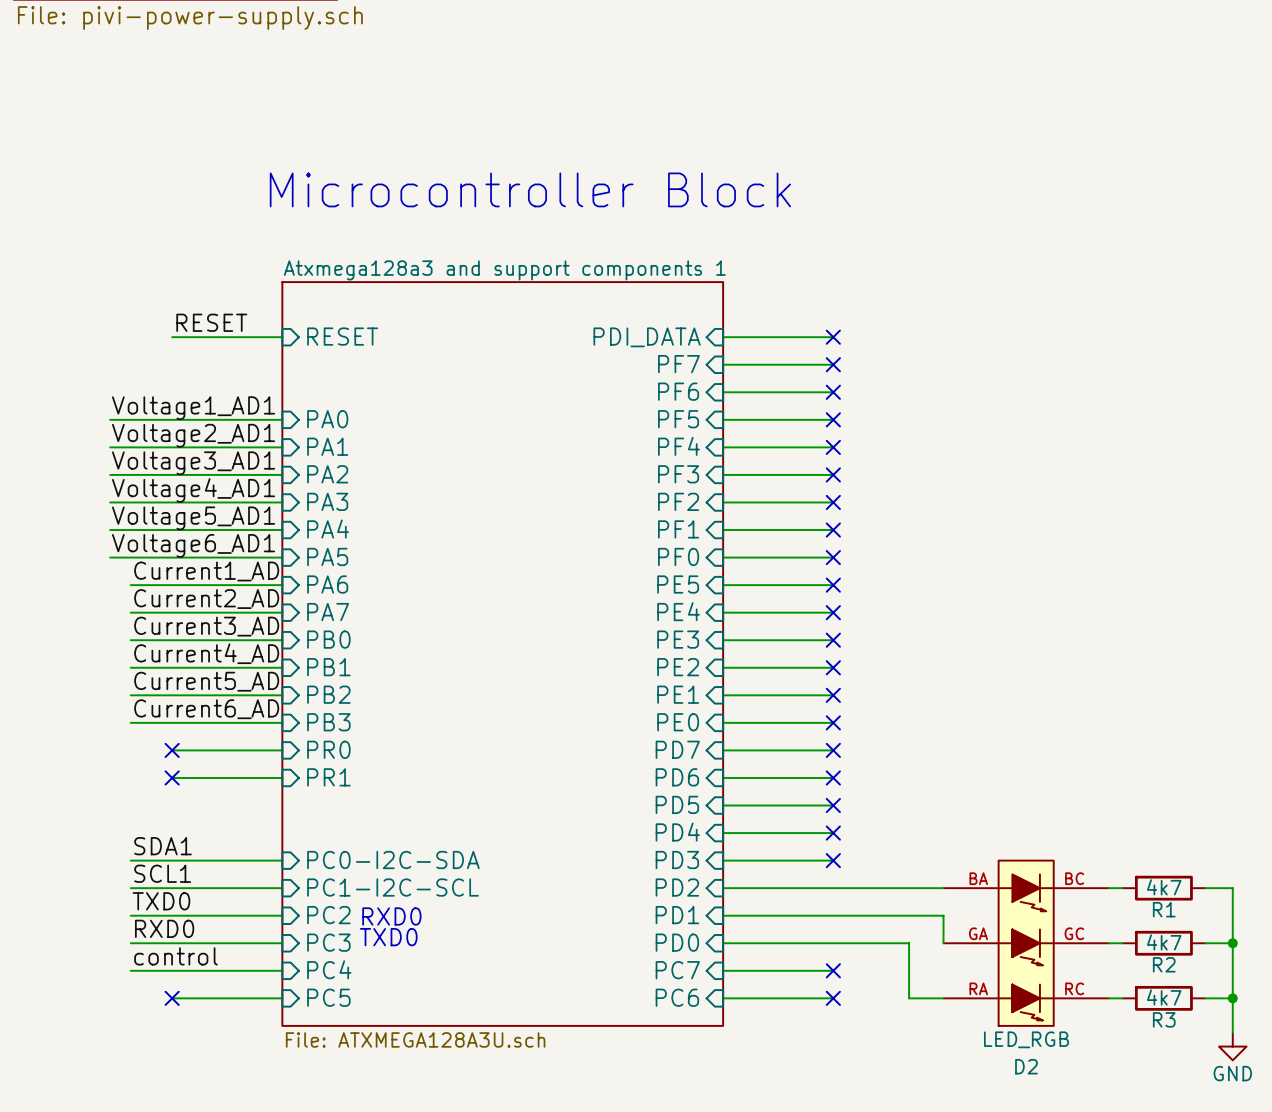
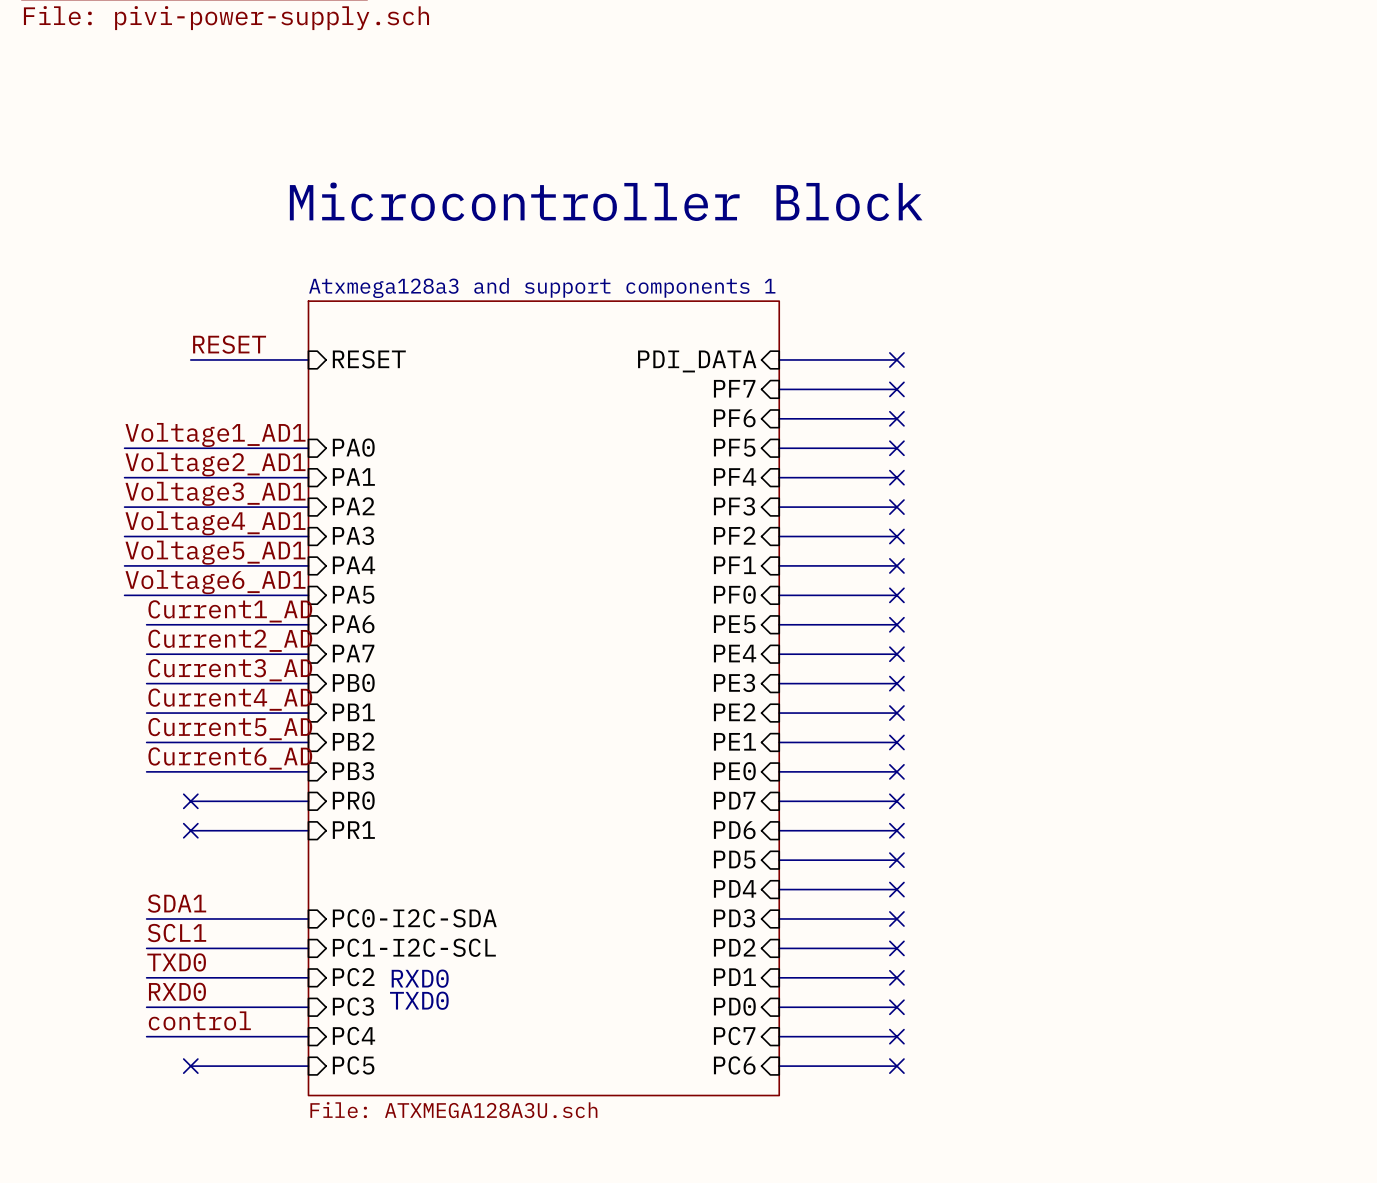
wire: (833, 888) (943, 888) -> none
no-connect mark: none -> (896, 948)
wire: (1108, 888) (1122, 888) -> none
R1: 4k7 (1163, 888) -> none
wire: (1205, 888) (1232, 888) (1232, 1032) -> none
wire: (833, 915) (943, 915) (943, 943) -> none
no-connect mark: none -> (896, 977)
wire: (833, 943) (909, 943) (909, 998) (943, 998) -> none
no-connect mark: none -> (896, 1007)
D2: LED_RGB (1026, 943) -> none
wire: (1108, 943) (1122, 943) -> none
R2: 4k7 (1163, 943) -> none
wire: (1205, 943) (1232, 943) -> none
junction: (1232, 943) -> none
wire: (1108, 998) (1122, 998) -> none
R3: 4k7 (1163, 998) -> none
wire: (1205, 998) (1232, 998) -> none
junction: (1232, 998) -> none
power symbol: GND (1232, 1046) -> none

